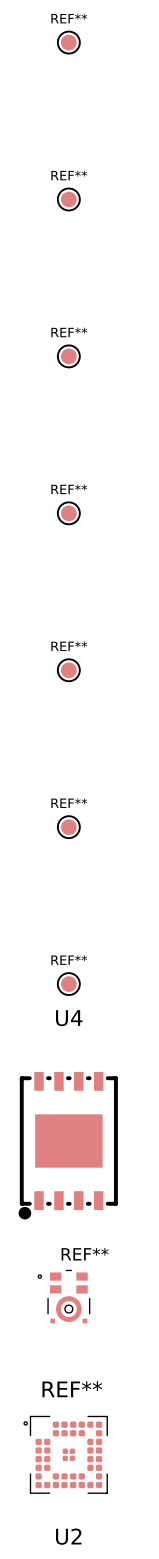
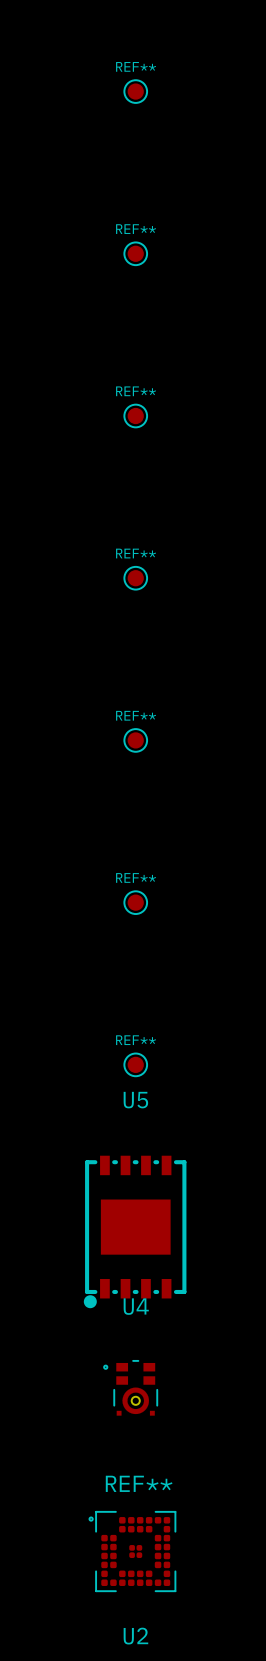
U4 name: U4 (69, 1018) -> U5 (135, 1100)
REF** name: REF** (85, 1254) -> U4 (136, 1306)

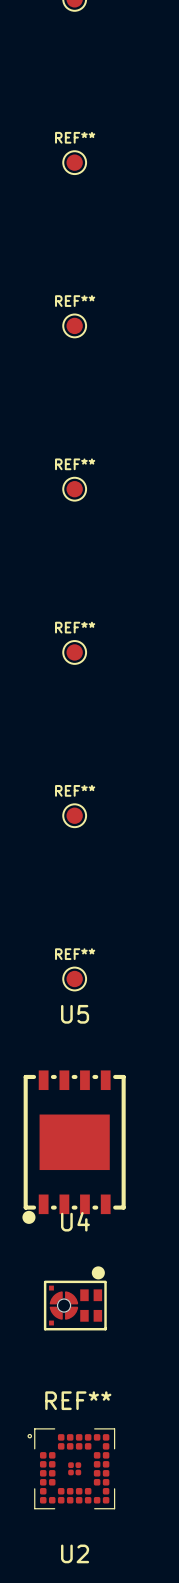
U4 footprint: [104, 1360, 158, 1416] -> [43, 1266, 107, 1331]

